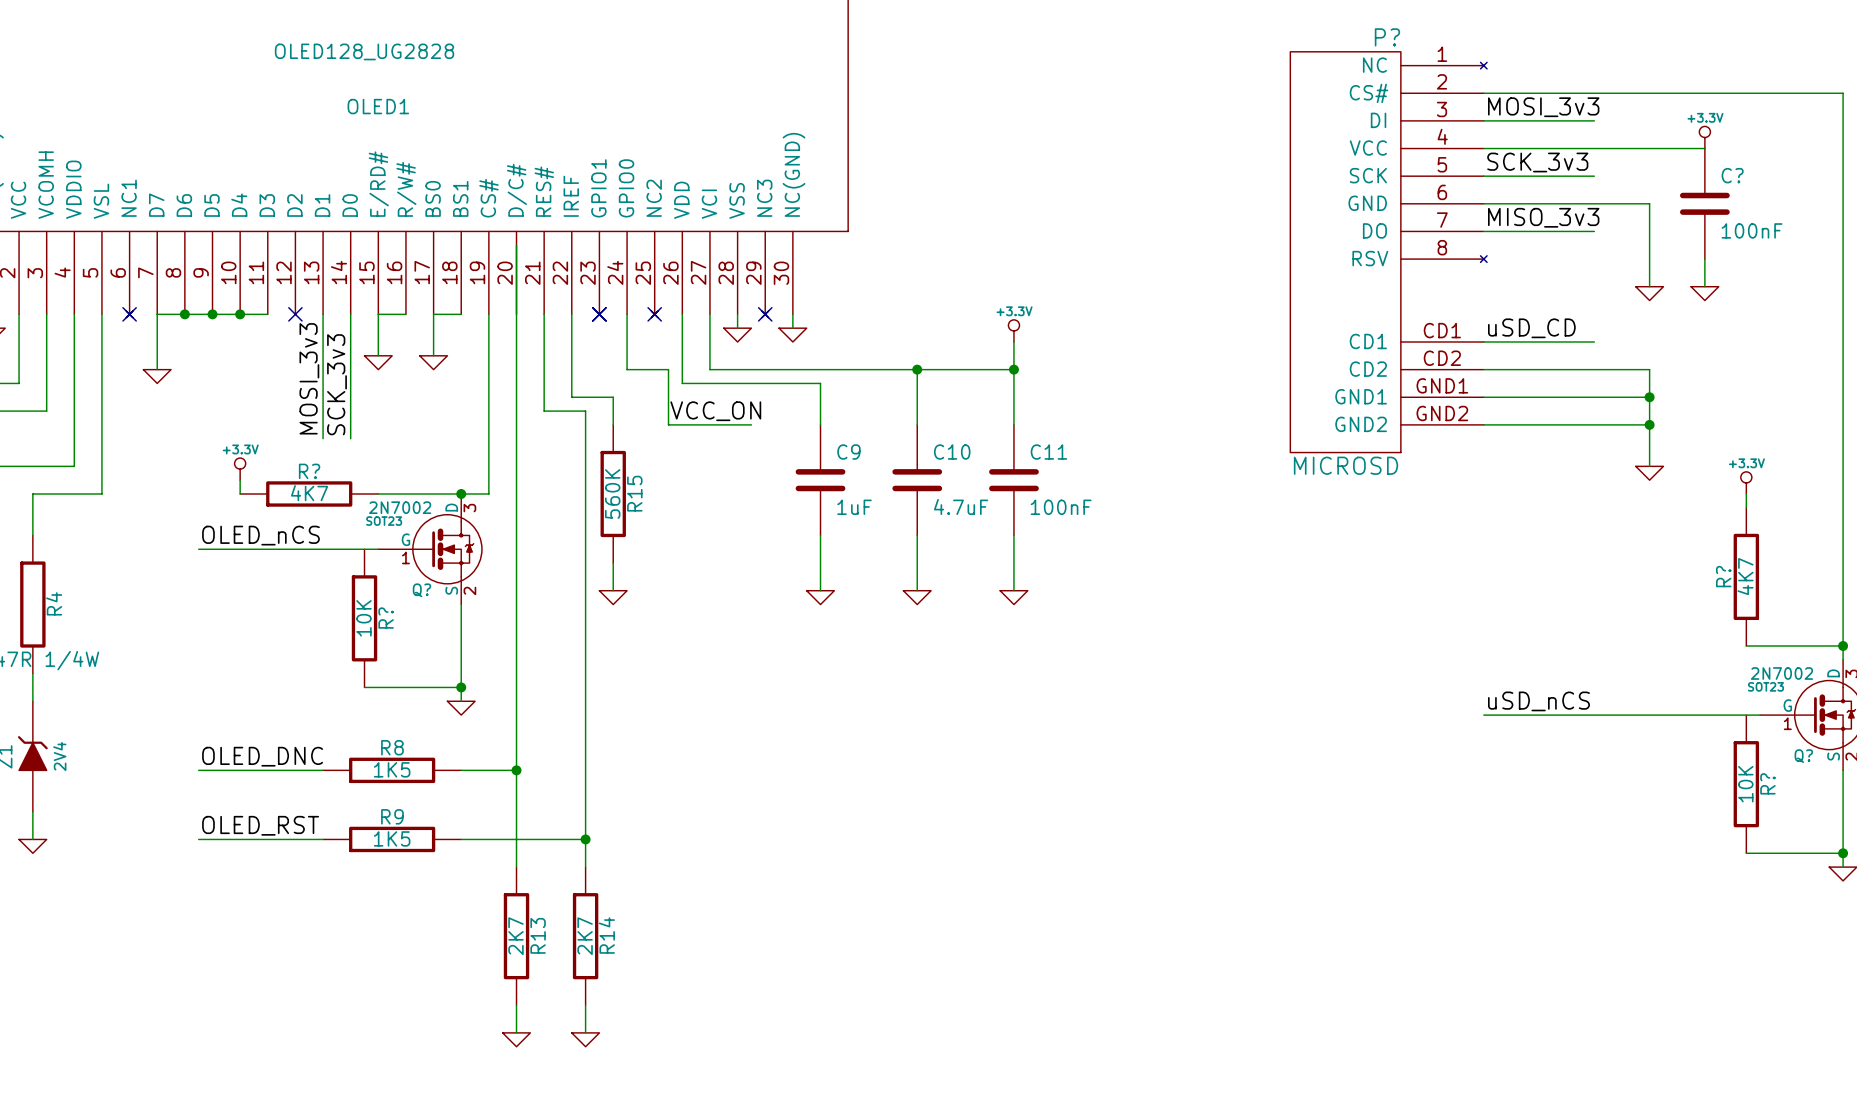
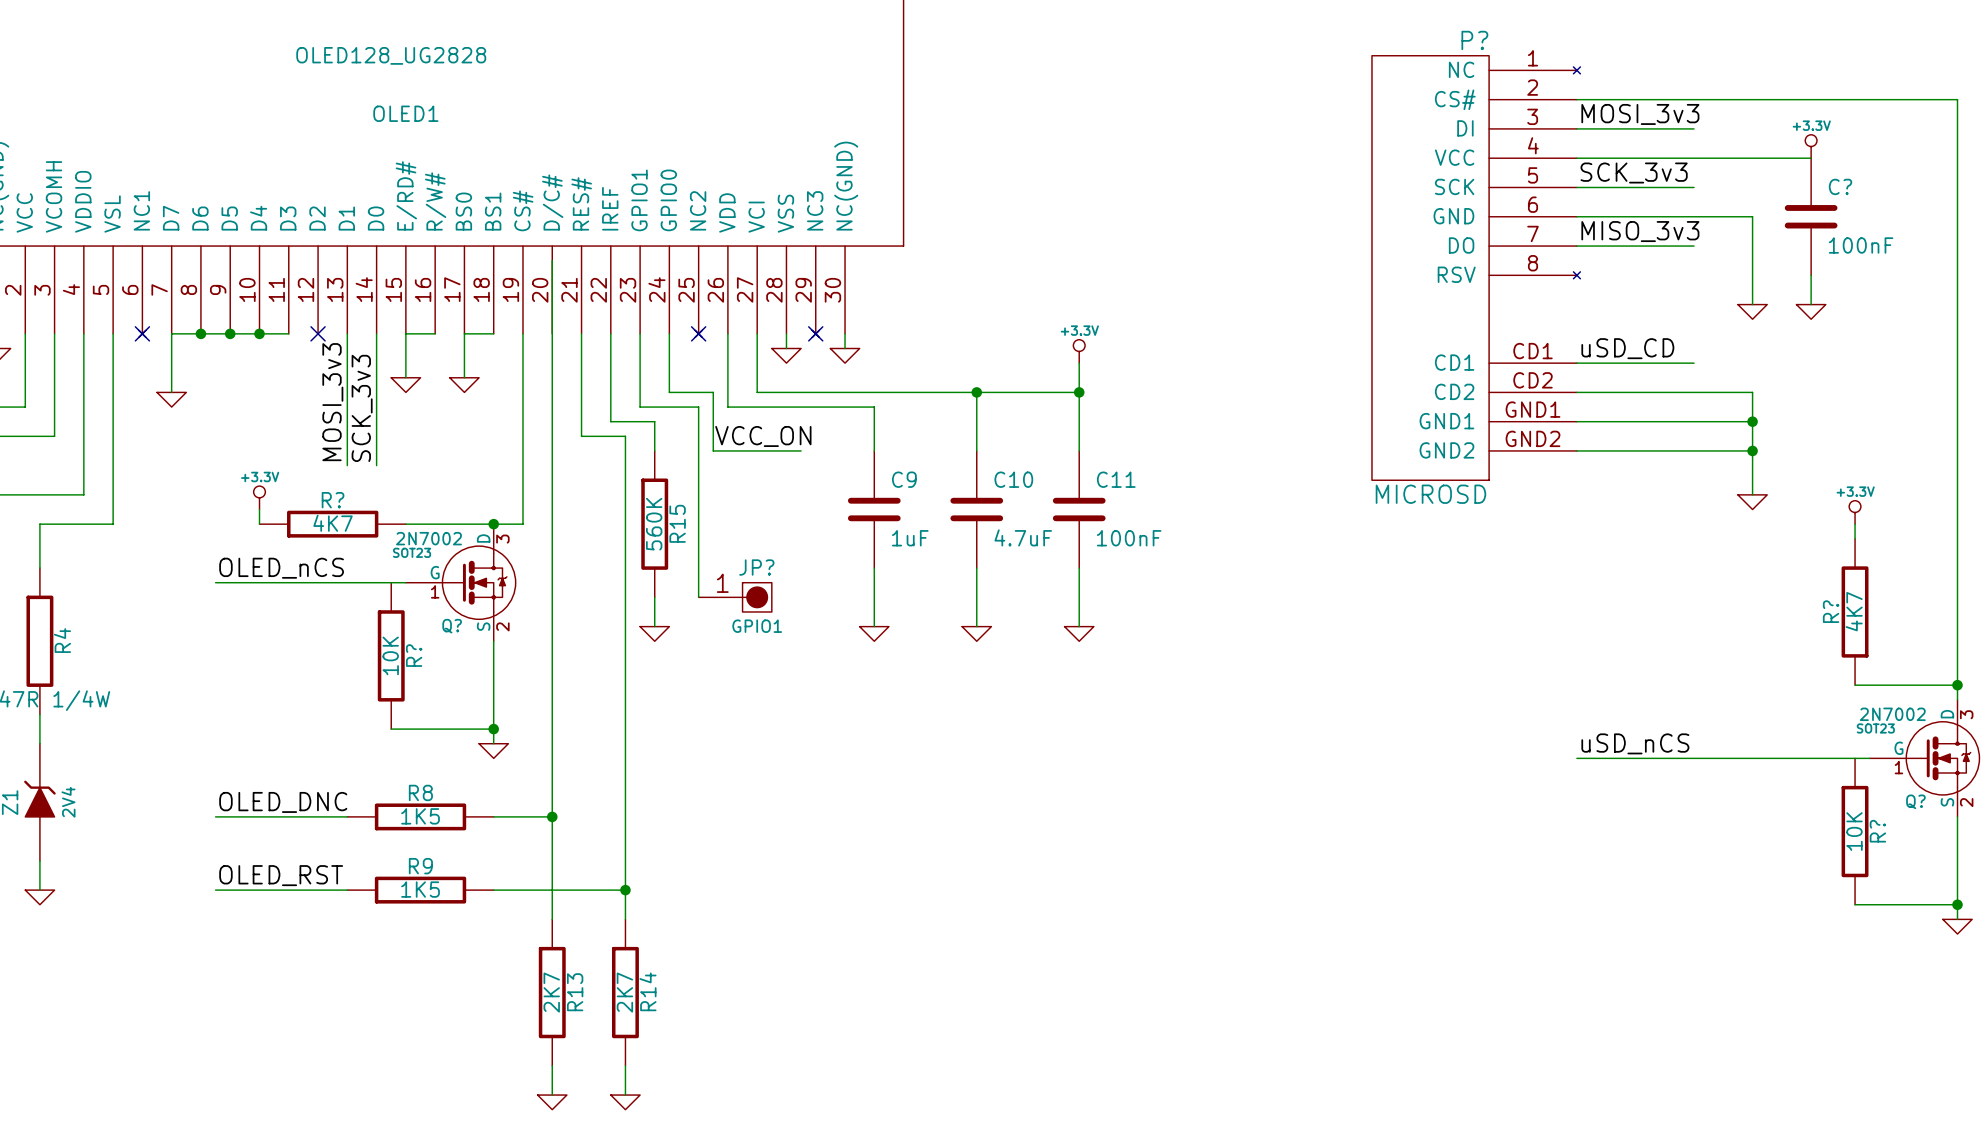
wire: none -> (640, 333) (640, 407) (698, 407) (698, 597)
no-connect mark: (599, 314) -> none
JP?: none -> GPIO1 (735, 597)

